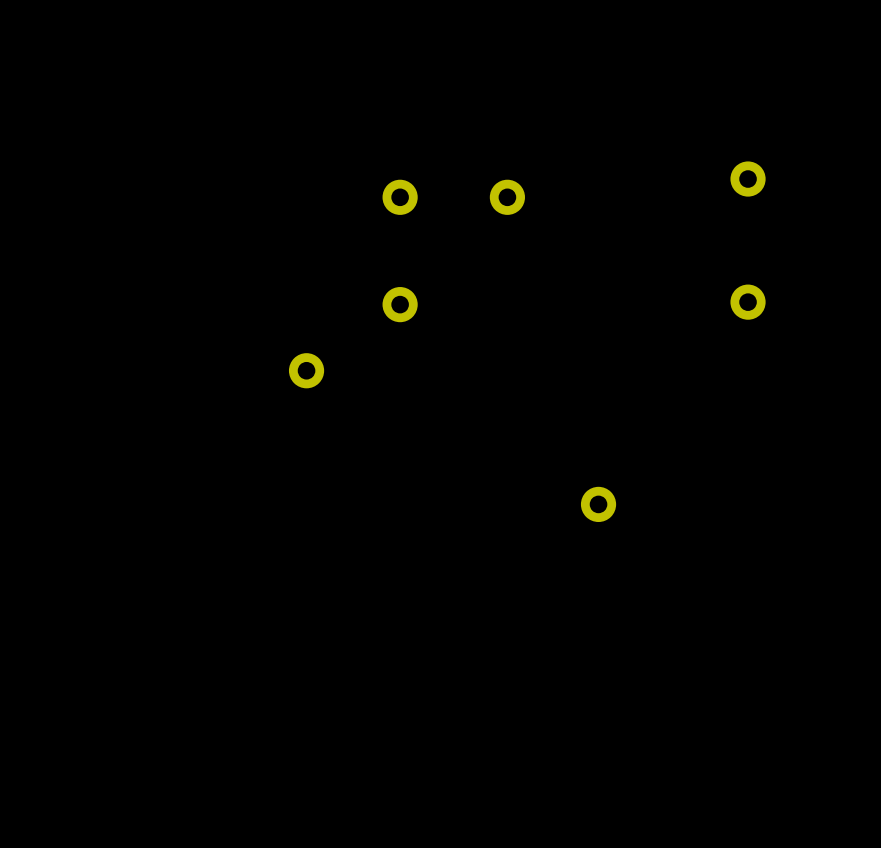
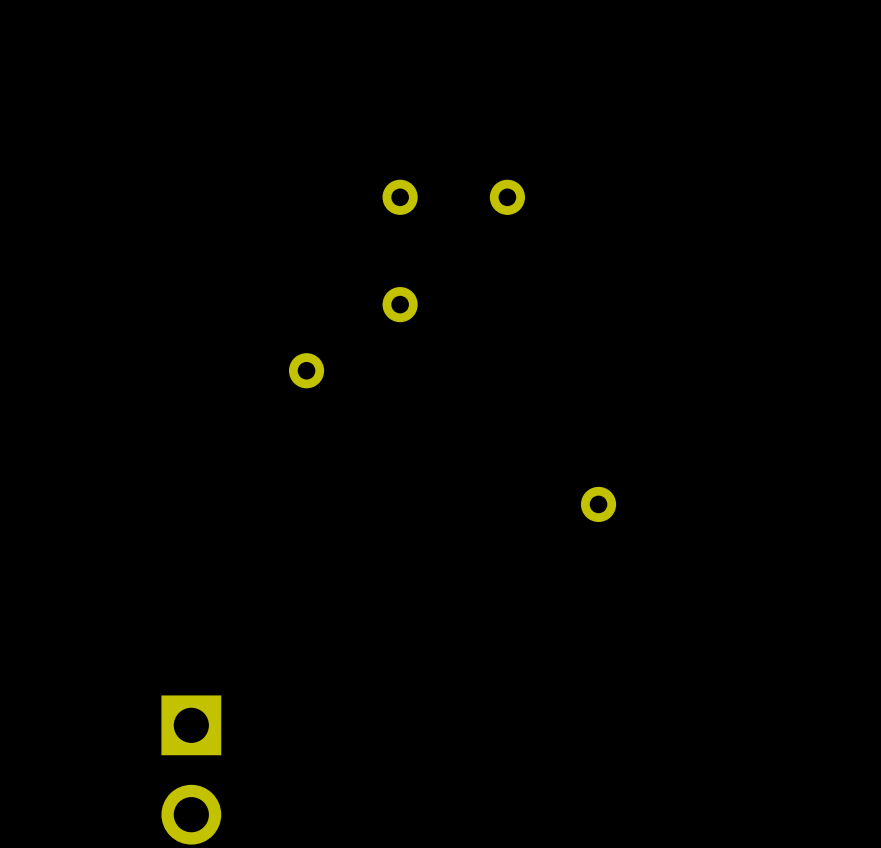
part: (748, 179) -> none
part: (748, 302) -> none
part: none -> (191, 770)

